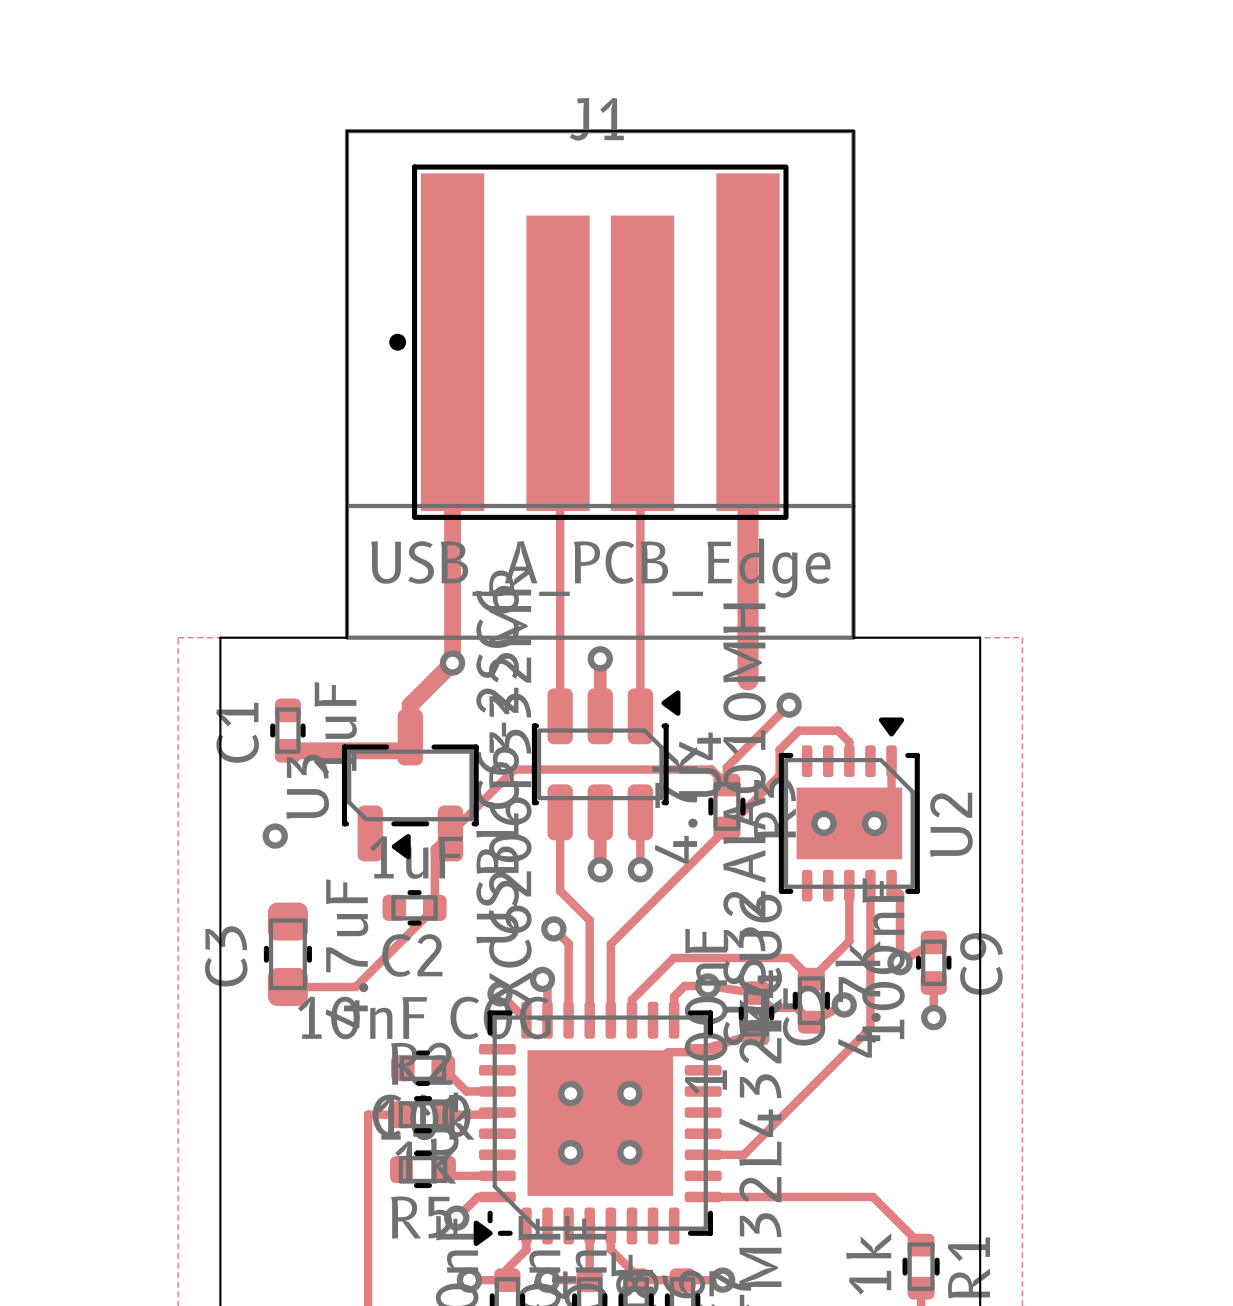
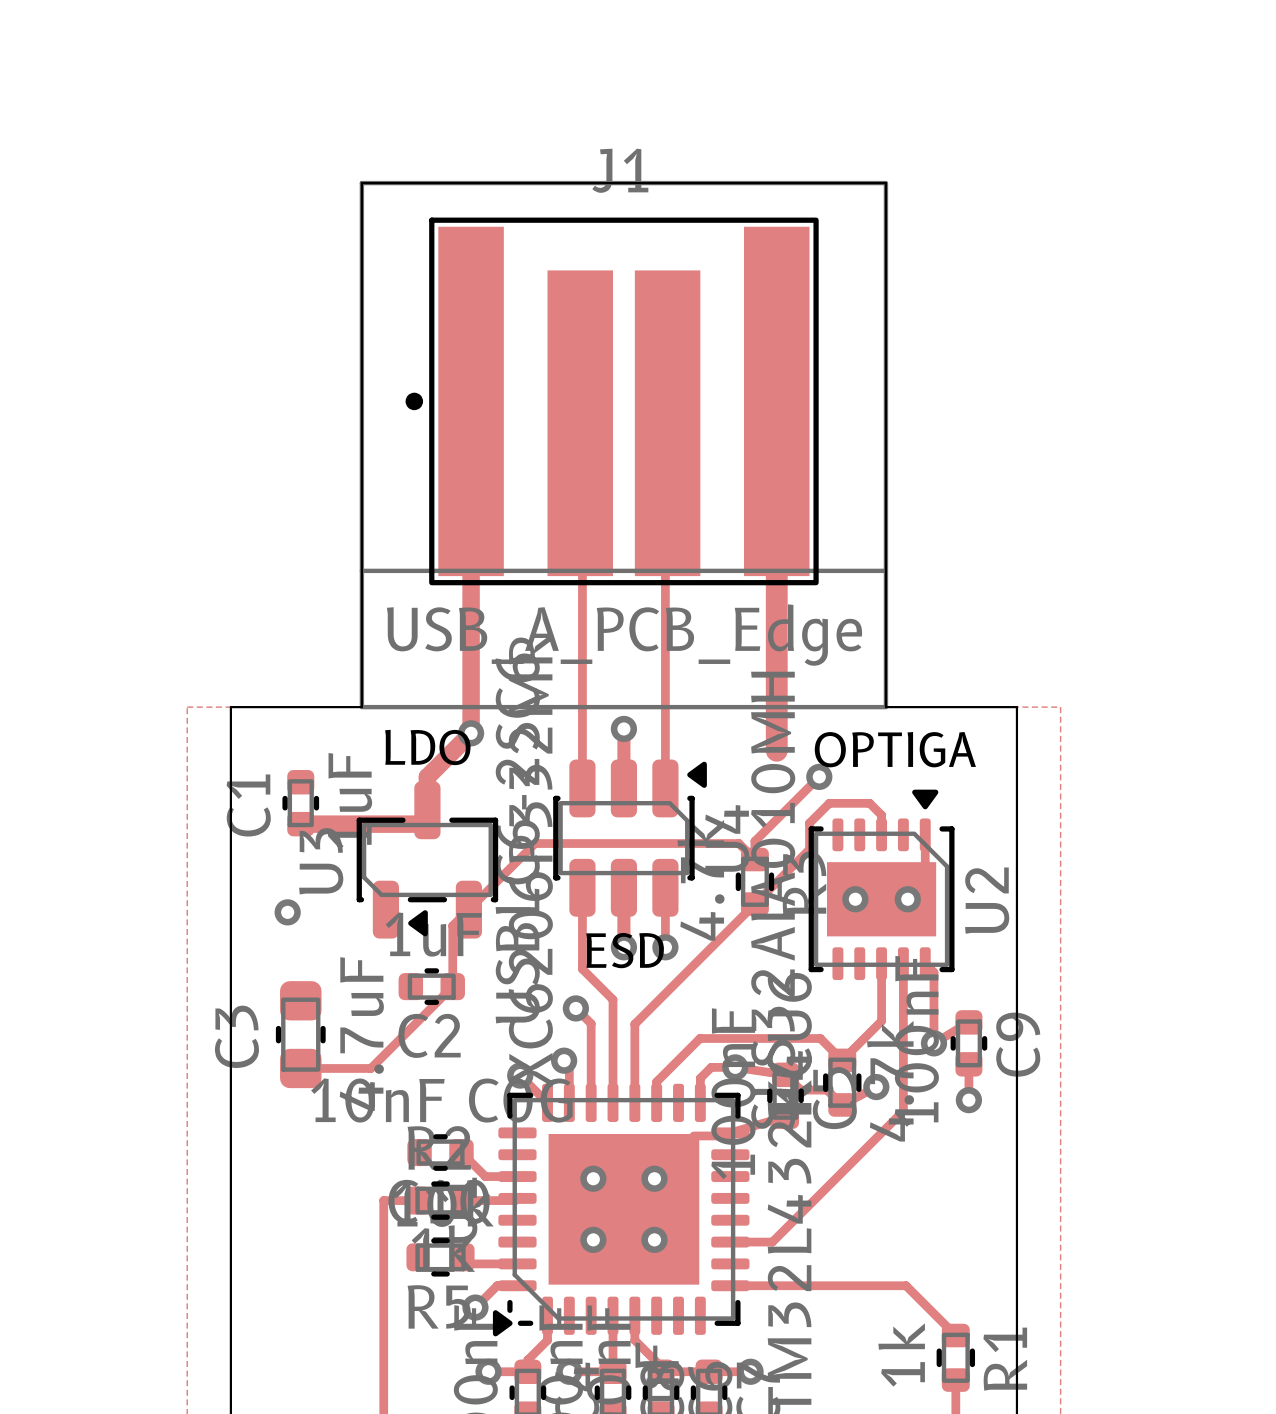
text: none -> LDO (427, 747)
text: none -> OPTIGA (895, 749)
text: none -> ESD (625, 950)

